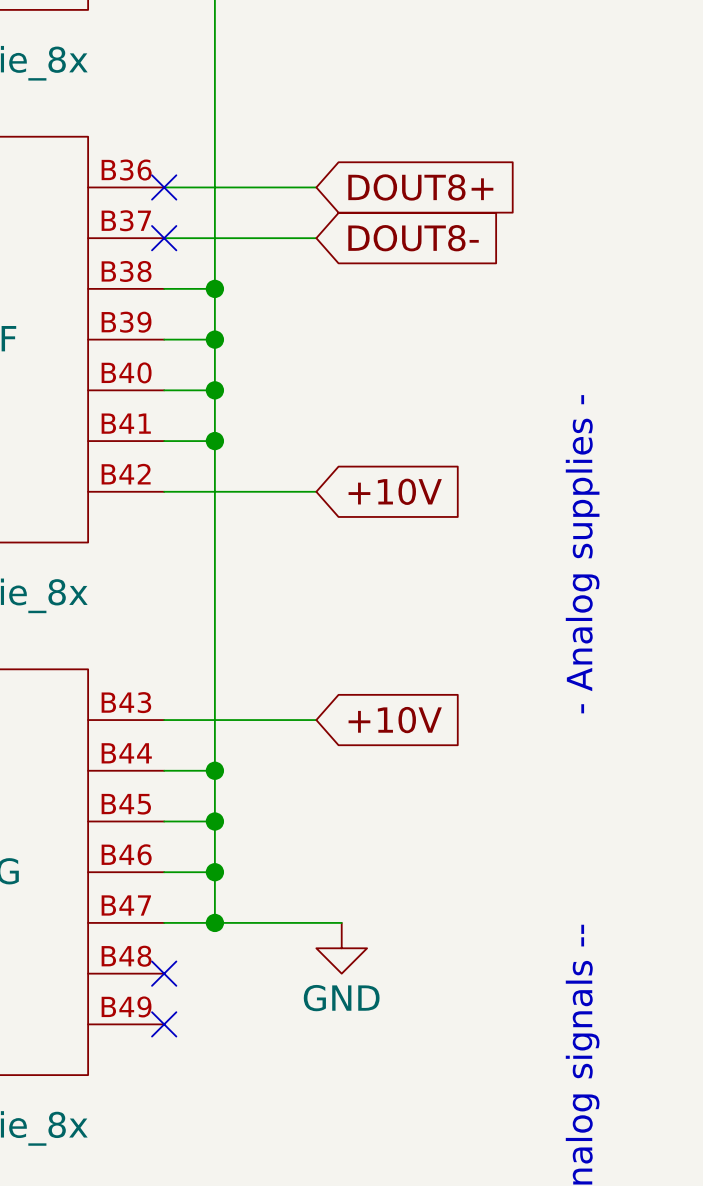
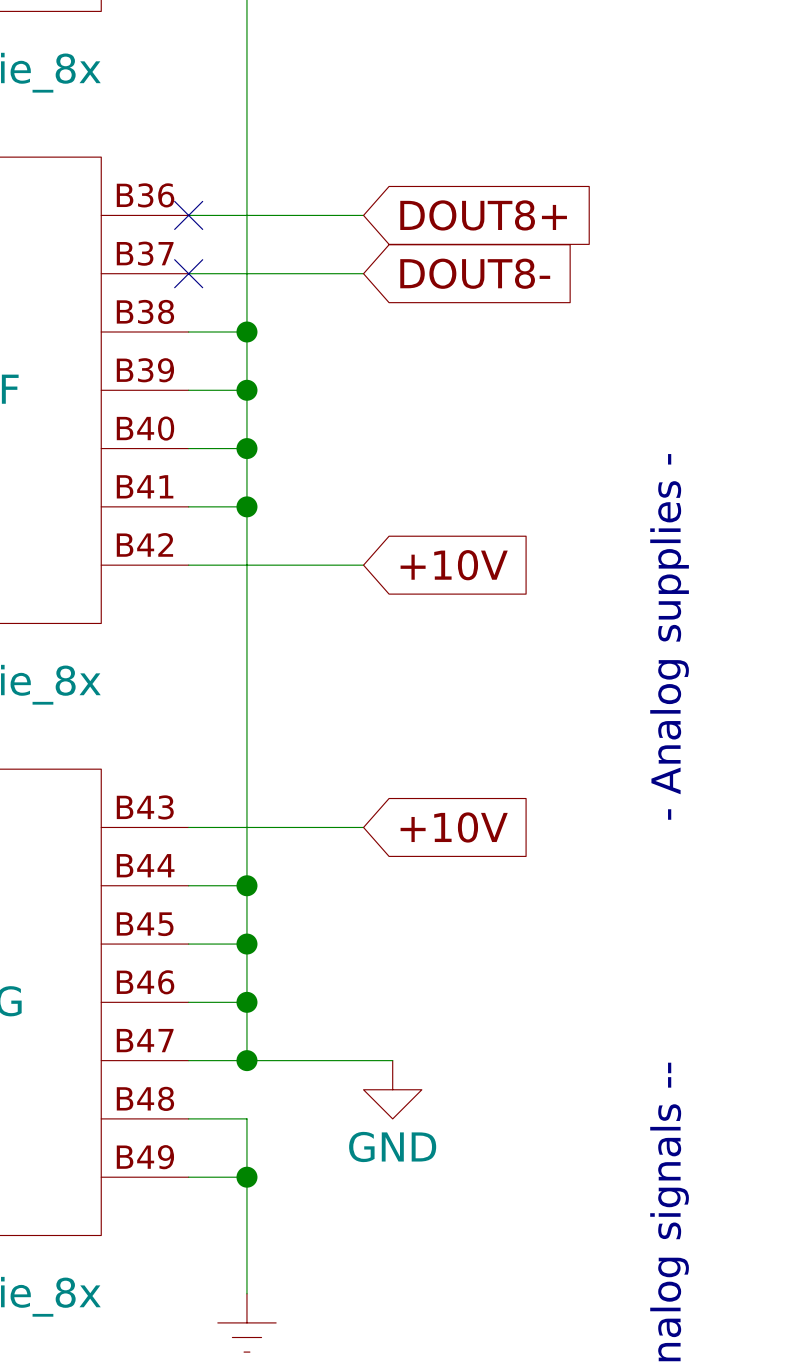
wire: none -> (188, 1118) (246, 1118) (246, 1293)
no-connect mark: (164, 973) -> none
wire: none -> (188, 1177) (246, 1177)
no-connect mark: (164, 1024) -> none
junction: none -> (246, 1177)
power symbol: none -> (246, 1322)

